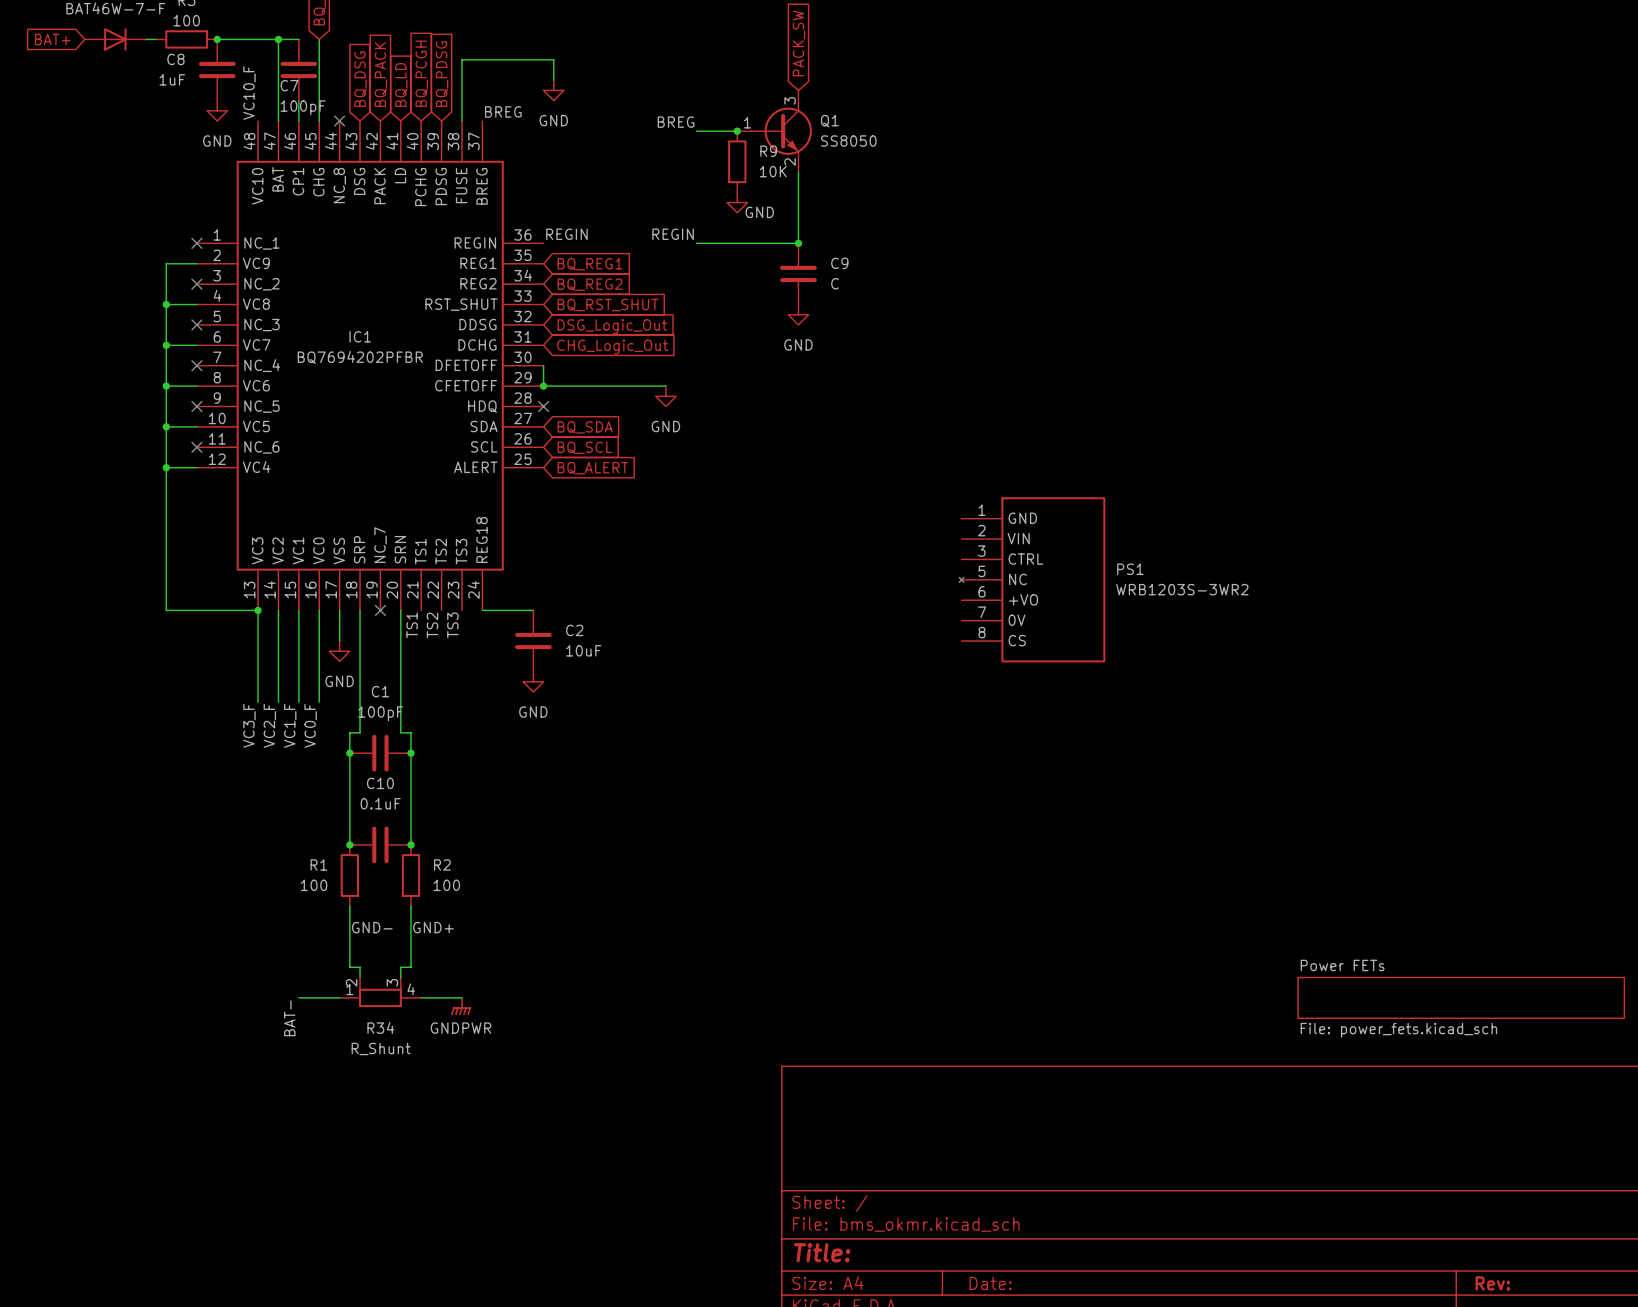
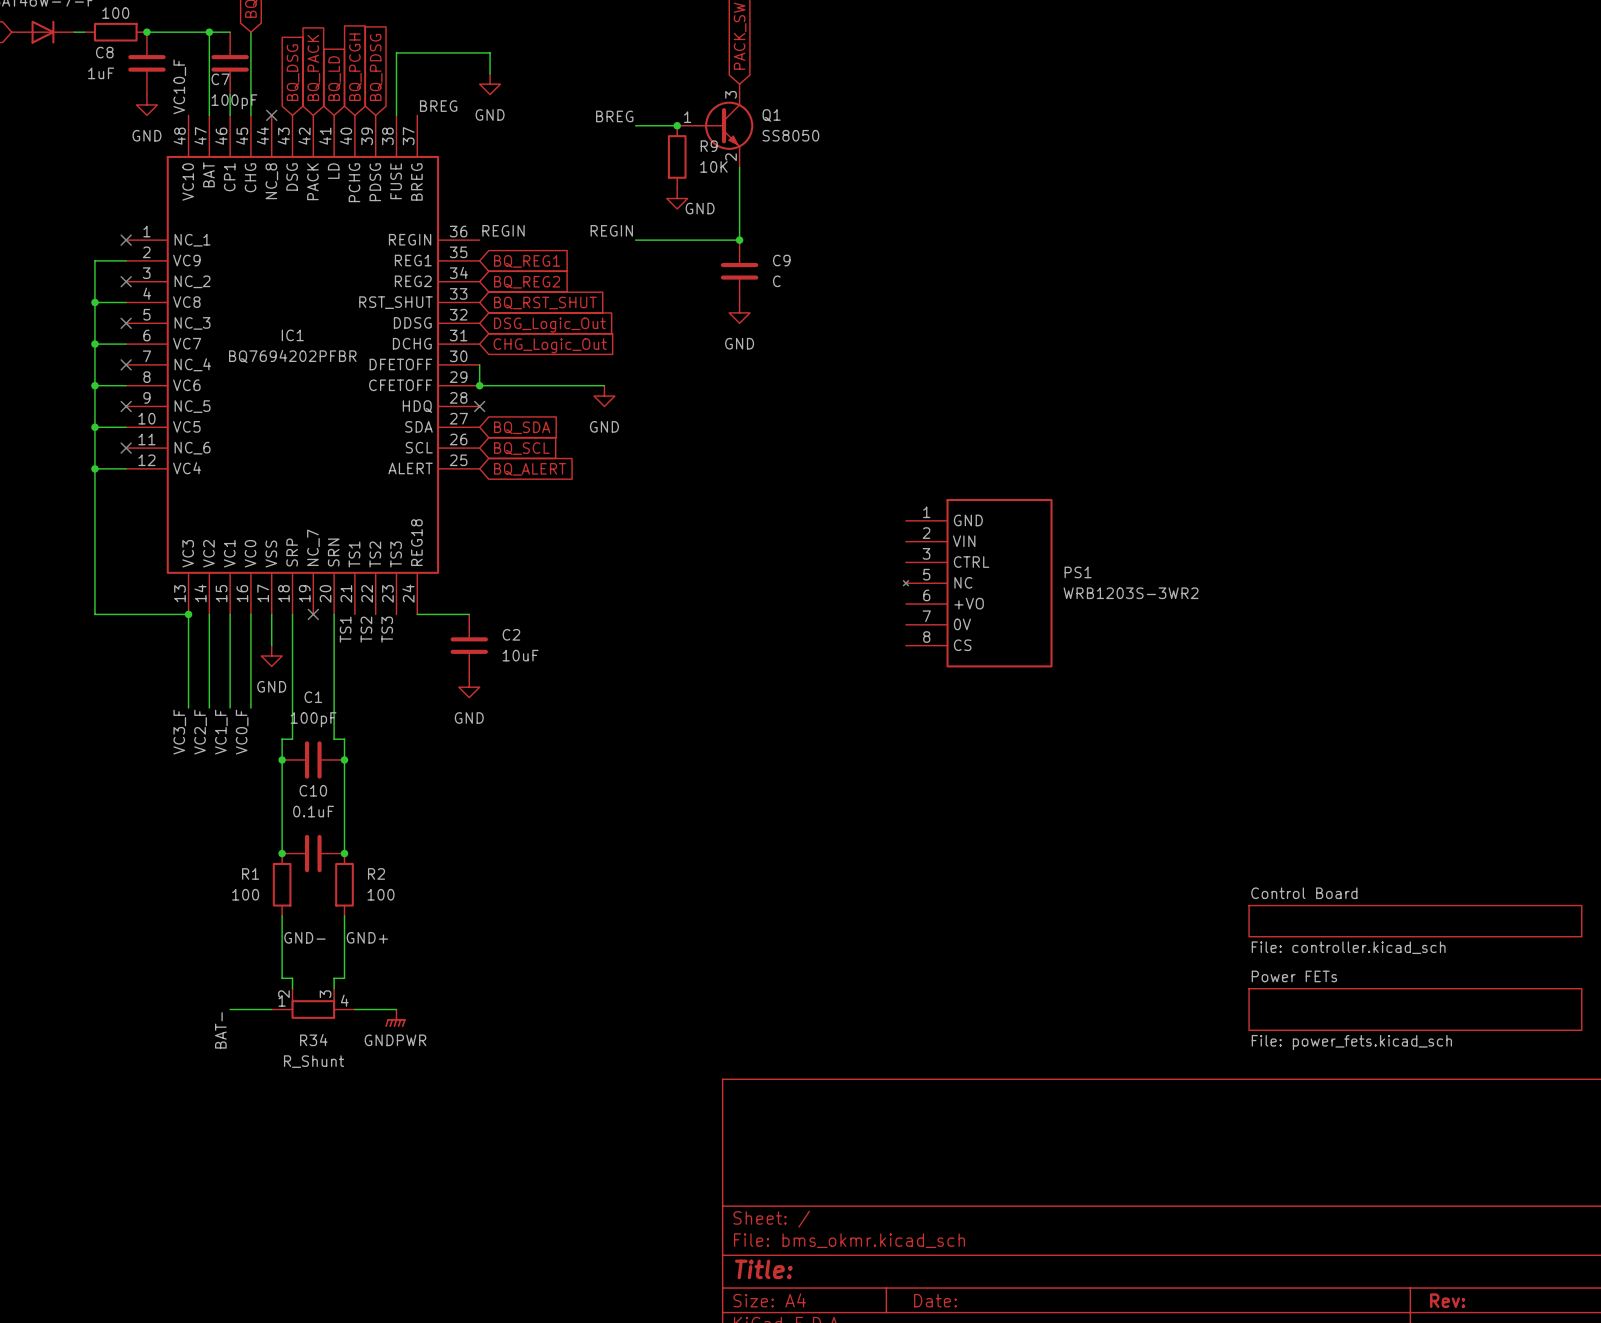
sheet Control Board: none -> File: controller.kicad_sch (1415, 921)

